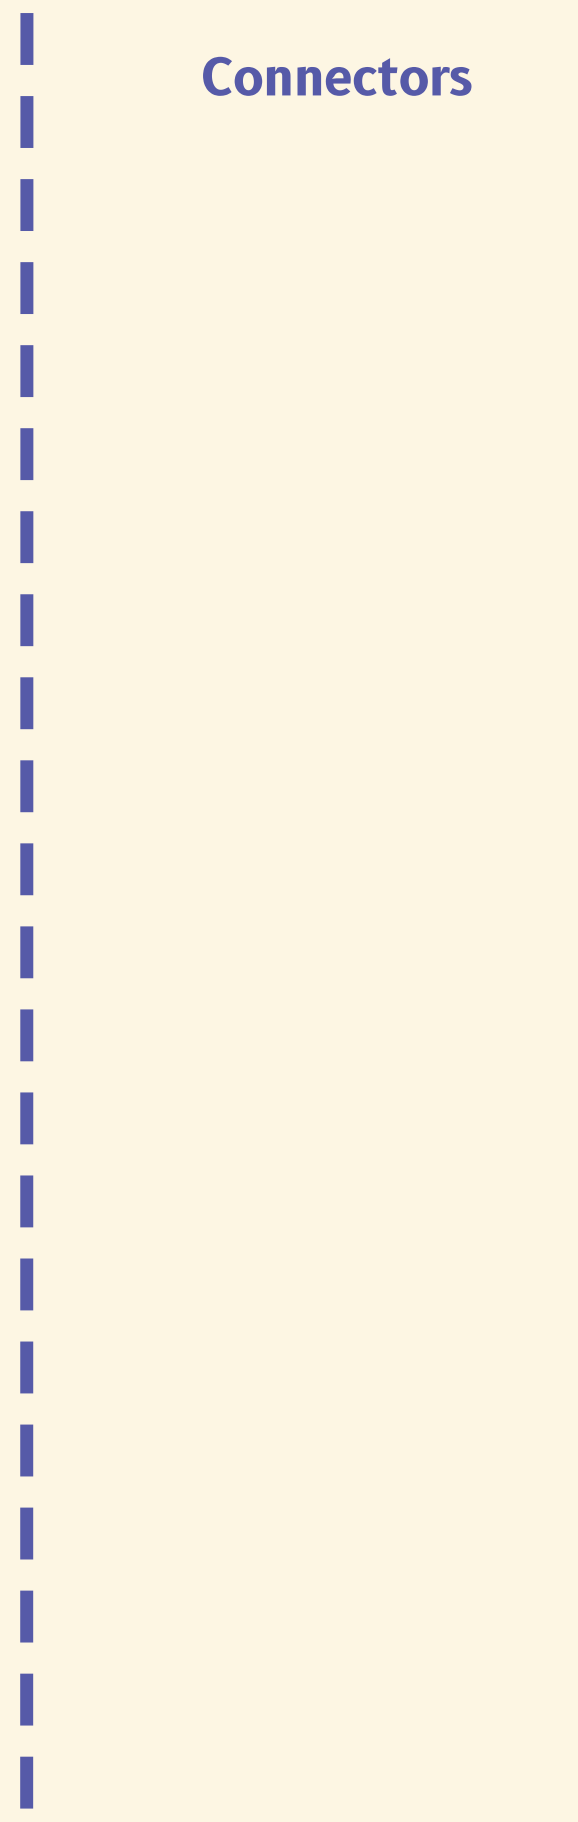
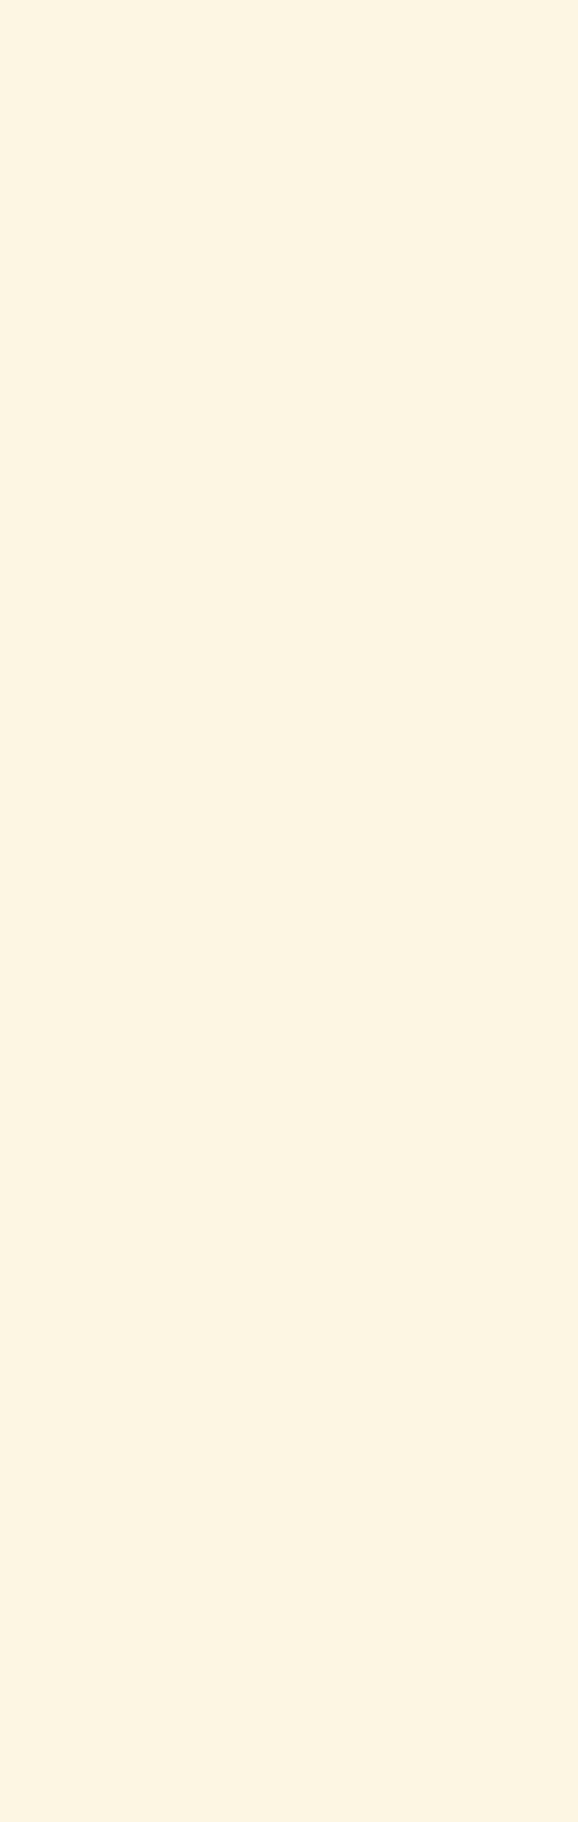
line: (26, 12) (26, 1808) -> none
text: Connectors (337, 76) -> none

